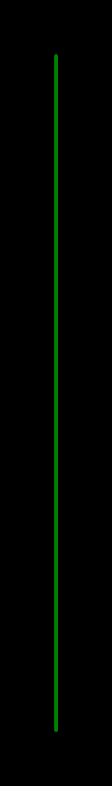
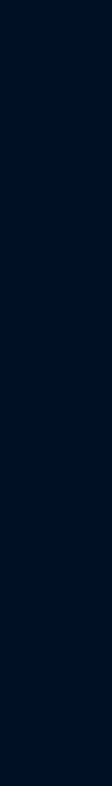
bottom track: (56, 56) (56, 730) -> none

